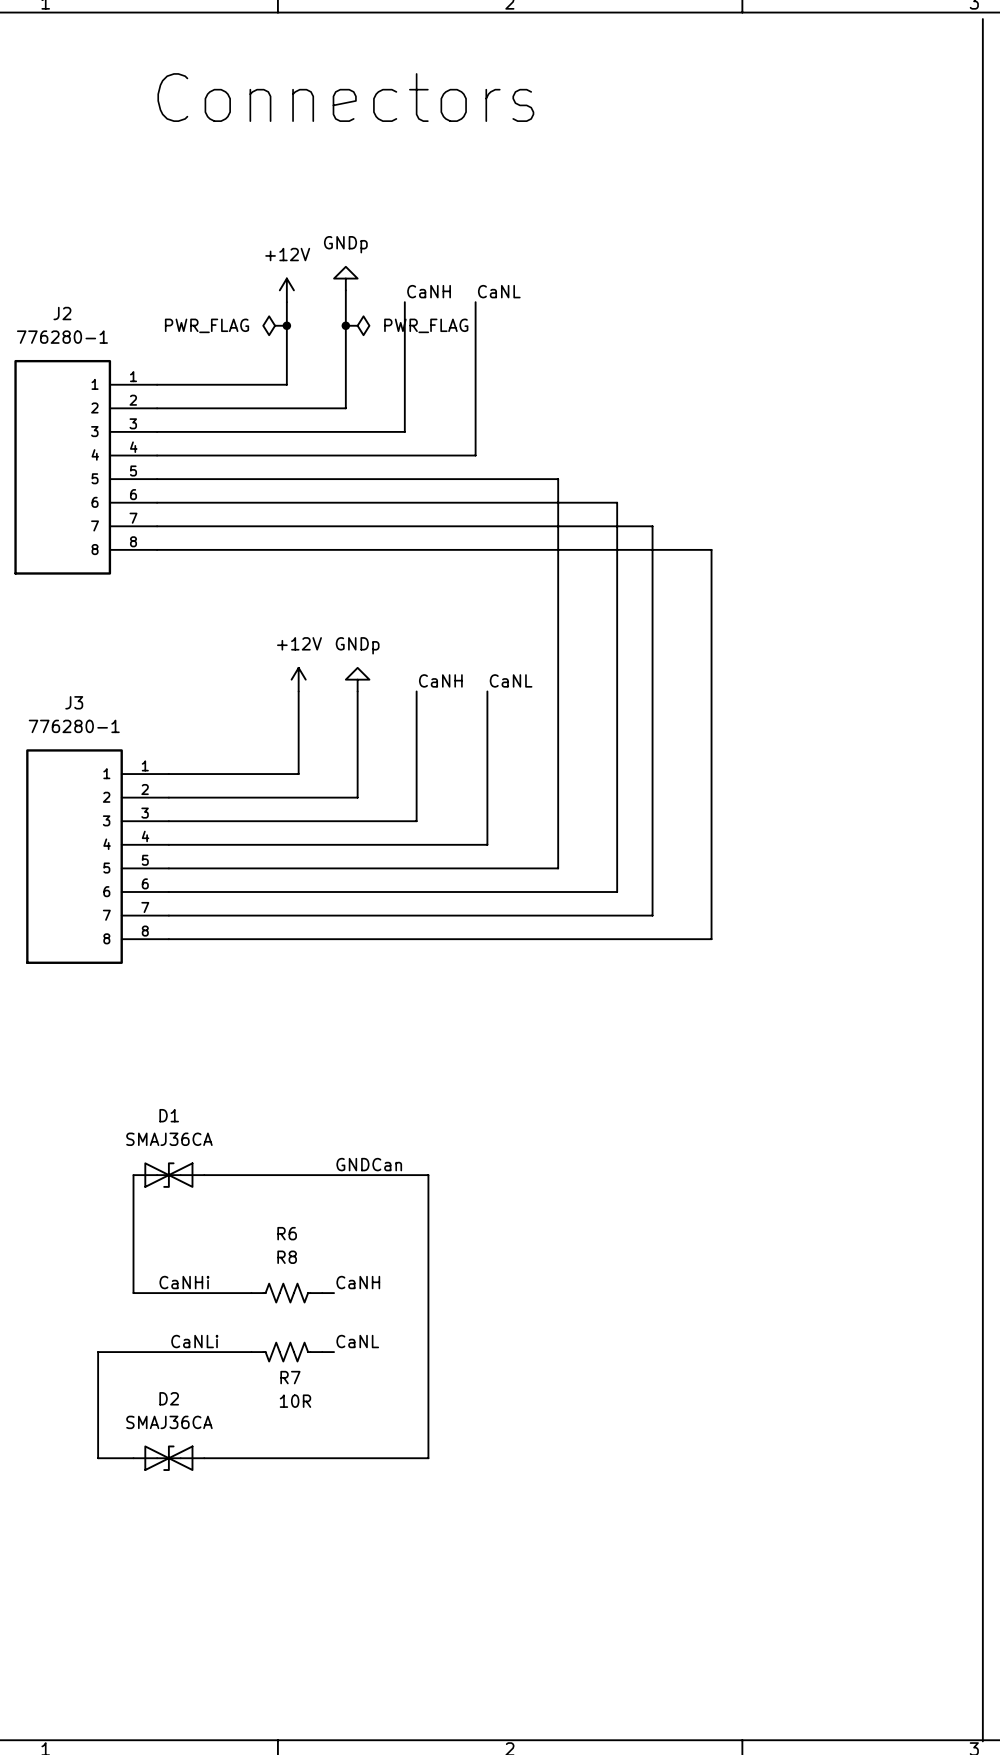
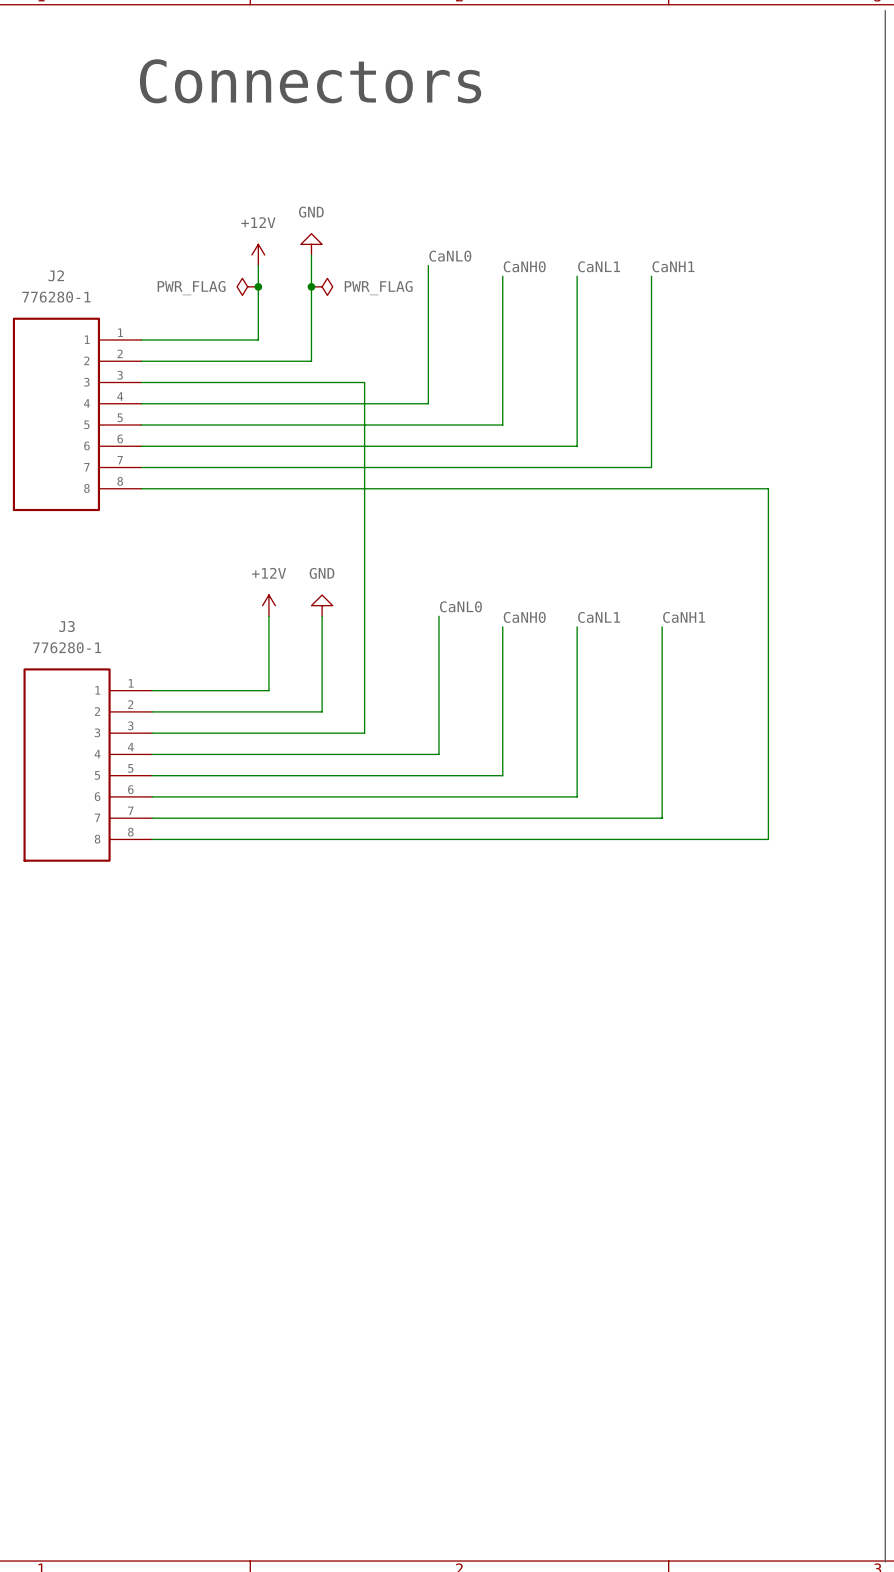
power symbol: GNDp (345, 278) -> GND (311, 244)
label: CaNH (429, 291) -> none
label: CaNL (499, 291) -> CaNL0 (450, 256)
wire: (404, 302) (404, 431) -> none
label: none -> CaNH0 (524, 266)
label: none -> CaNL1 (599, 266)
label: none -> CaNH1 (673, 266)
wire: none -> (577, 276) (577, 446) (555, 446)
wire: none -> (651, 276) (651, 467) (587, 467)
wire: (558, 479) (558, 703) -> (502, 425) (502, 276)
wire: (617, 502) (617, 891) -> (577, 626) (577, 796) (555, 796)
wire: (652, 526) (652, 915) -> (662, 626) (662, 818) (587, 818)
wire: (711, 549) (711, 939) -> (640, 488) (768, 488) (768, 839) (640, 839)
power symbol: GNDp (357, 679) -> GND (322, 605)
label: CaNH (440, 680) -> none
label: CaNL (511, 680) -> CaNL0 (460, 606)
wire: (416, 691) (416, 821) (404, 821) -> (364, 382) (364, 733)
label: none -> CaNH0 (524, 617)
label: none -> CaNL1 (599, 617)
label: none -> CaNH1 (684, 617)
label: GNDCan (369, 1164) -> none
wire: (133, 1175) (133, 1293) (251, 1293) -> none
D1: SMAJ36CA (168, 1175) -> none
wire: (204, 1175) (428, 1175) (428, 1458) (204, 1458) -> none
label: CaNHi (184, 1282) -> none
label: CaNH (358, 1282) -> none
R6: R8 (286, 1293) -> none
wire: (322, 1293) (334, 1293) -> none
label: CaNLi (194, 1341) -> none
label: CaNL (357, 1341) -> none
wire: (251, 1352) (98, 1352) (98, 1458) (133, 1458) -> none
R7: 10R (286, 1352) -> none
wire: (322, 1352) (334, 1352) -> none
D2: SMAJ36CA (168, 1458) -> none

